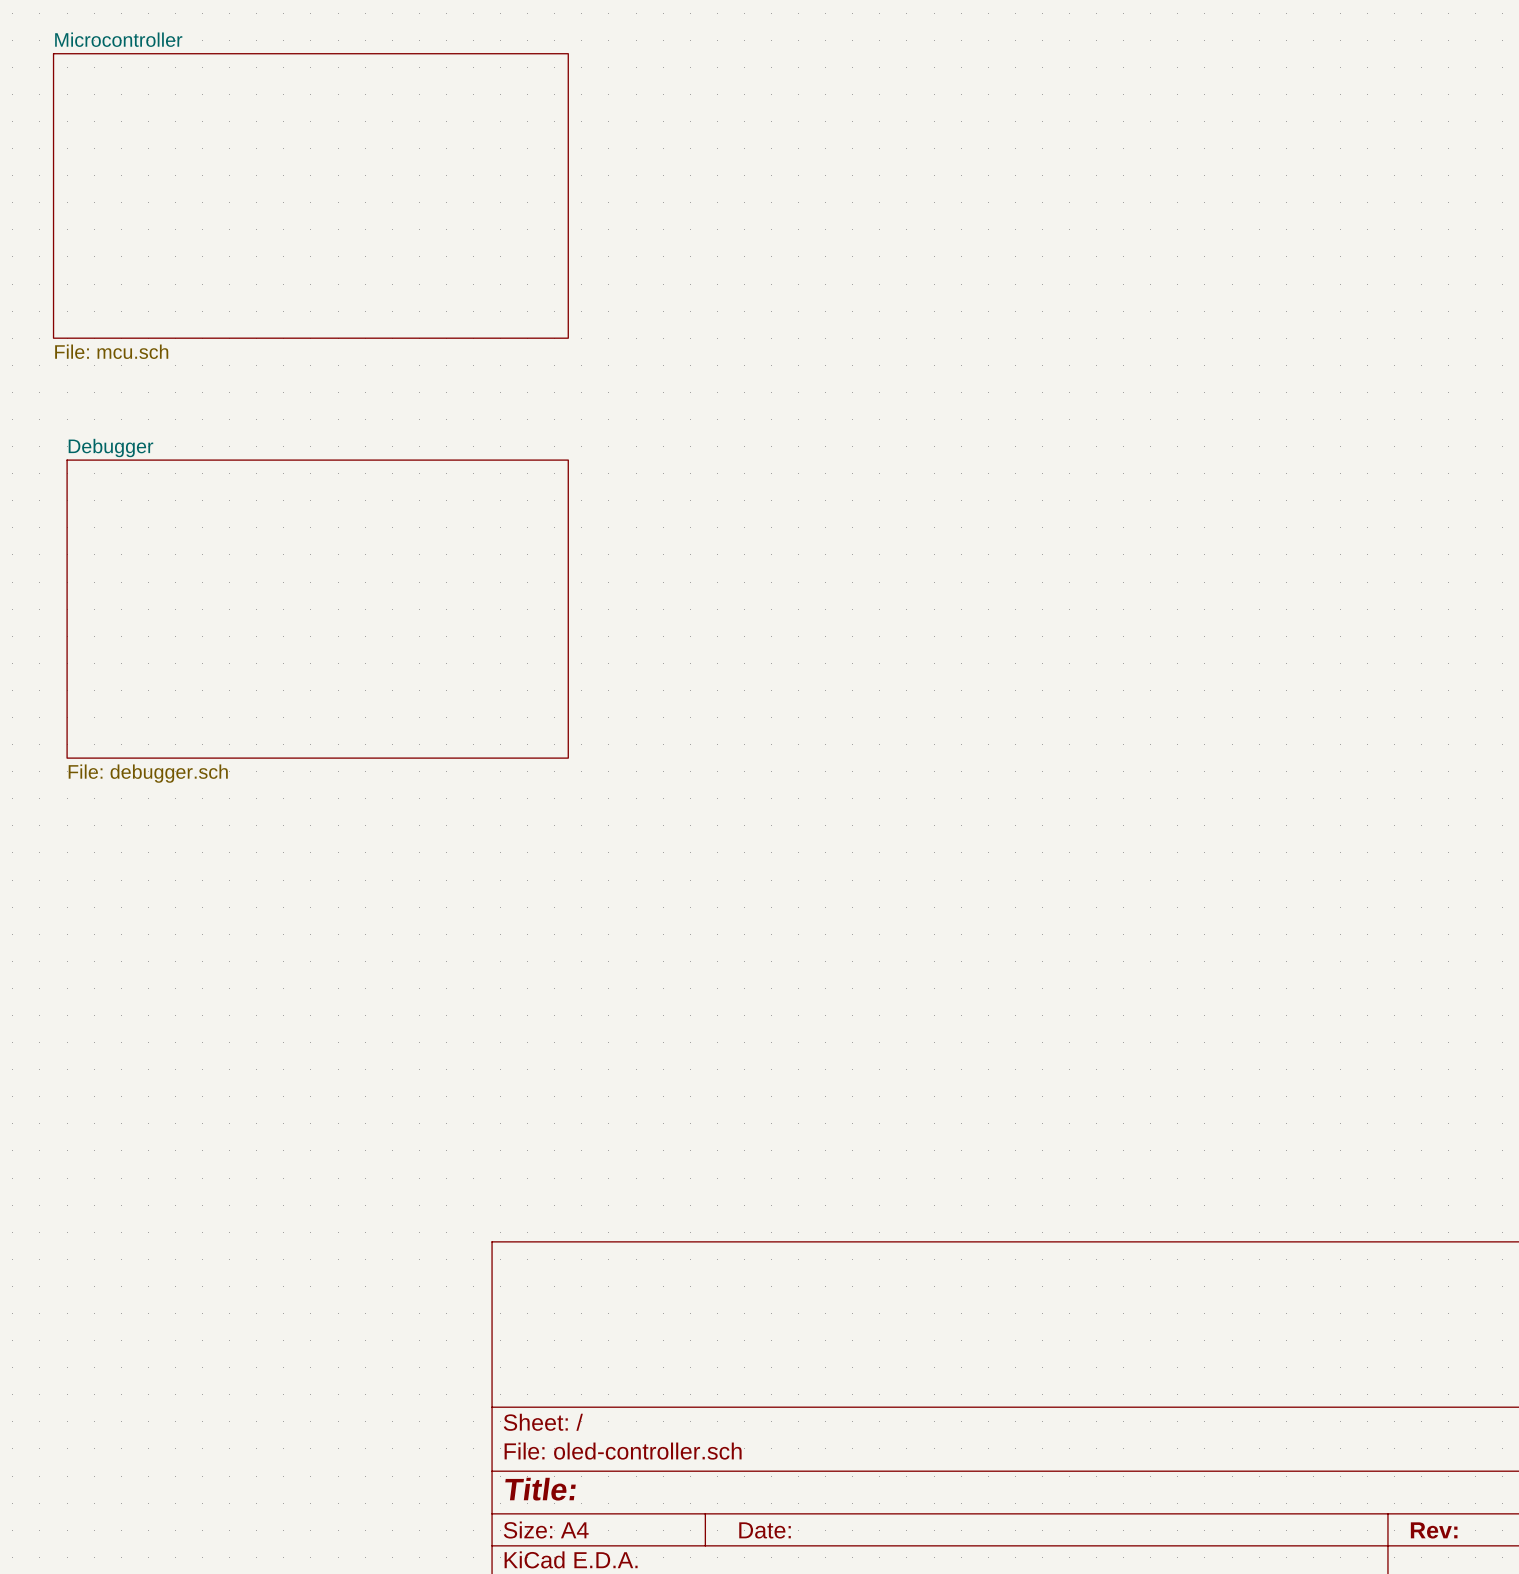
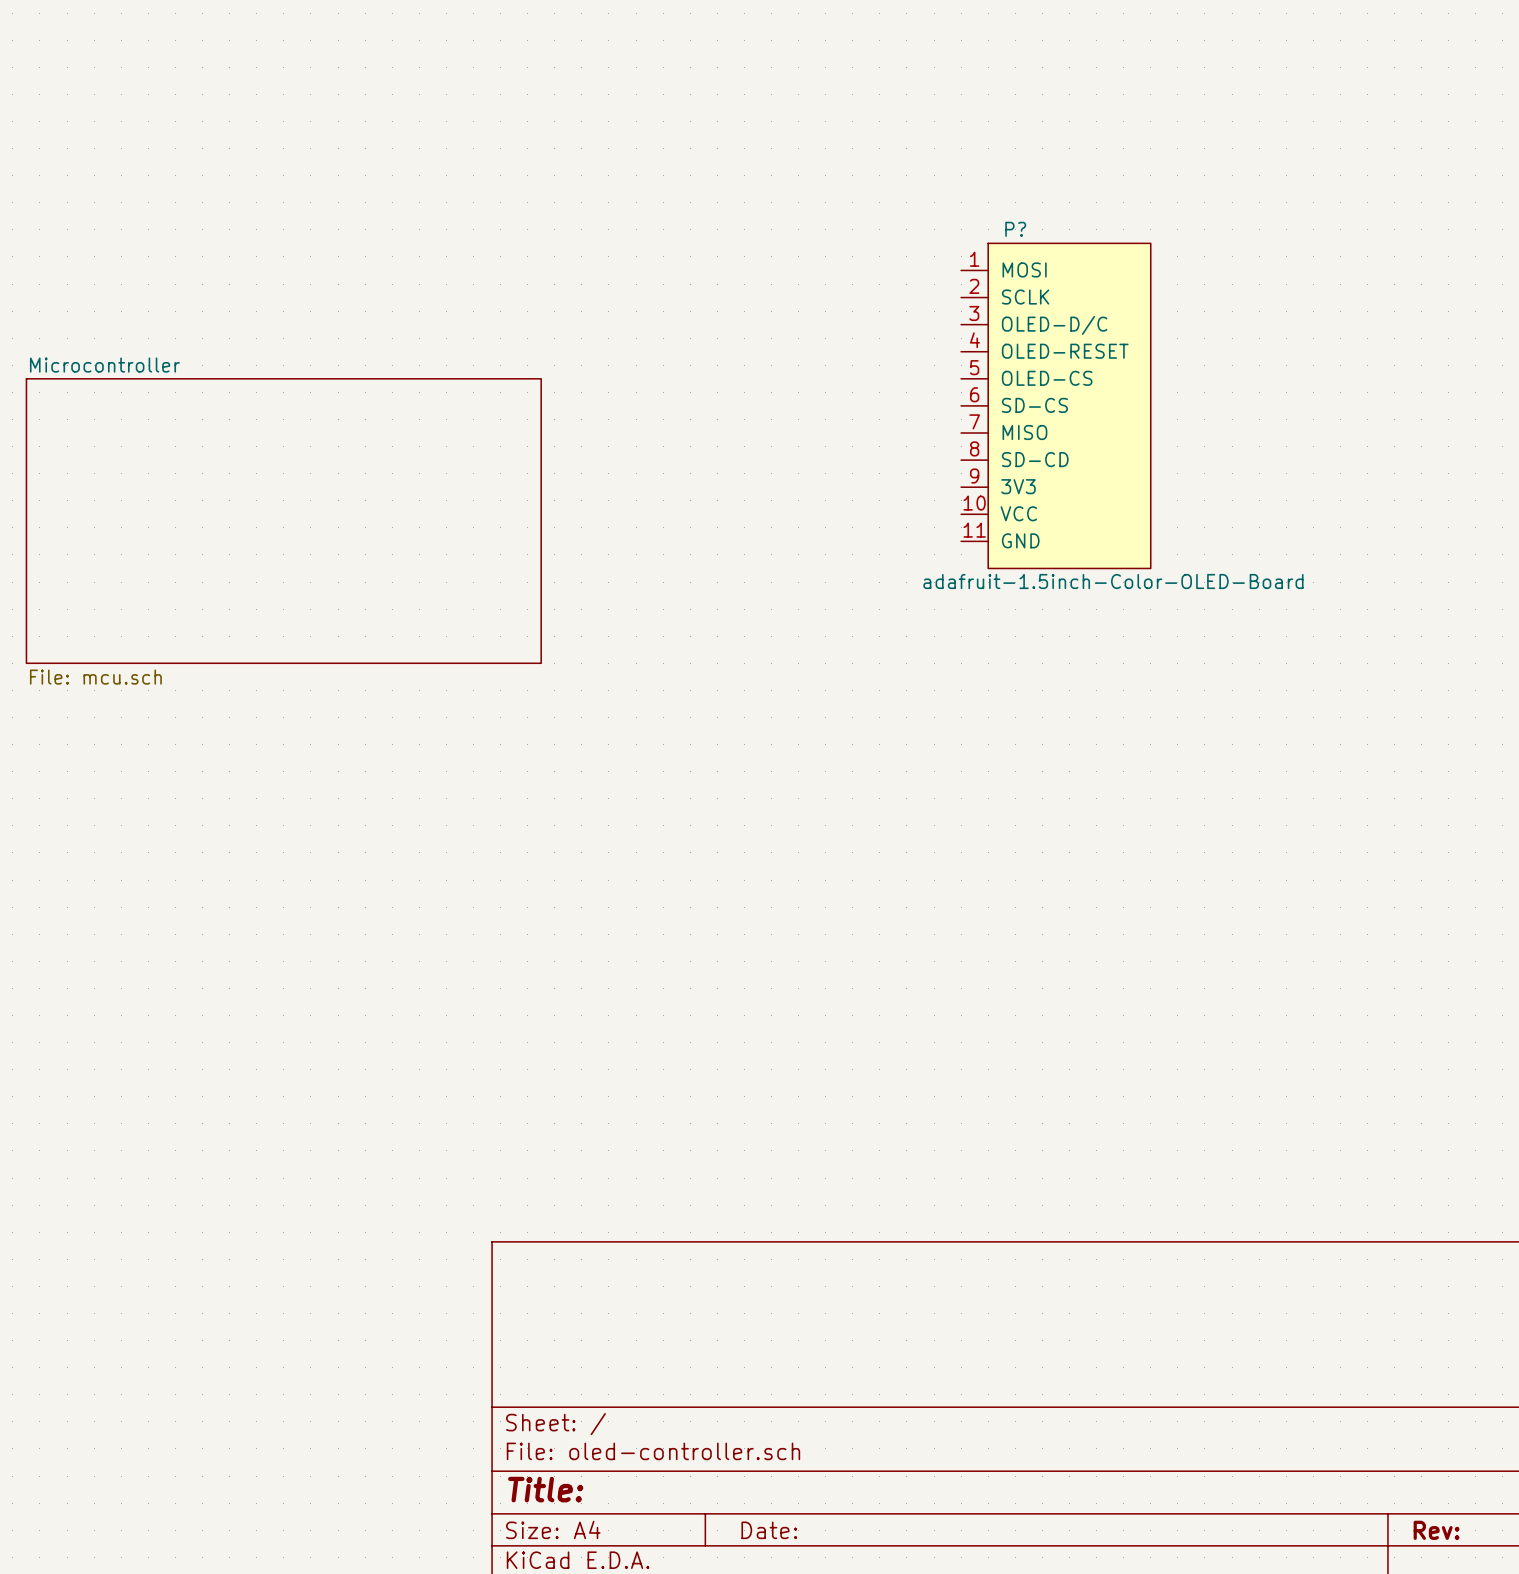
sheet Microcontroller: File: mcu.sch (310, 195) -> none
P?: none -> adafruit-1.5inch-Color-OLED-Board (1055, 405)
sheet Microcontroller: none -> File: mcu.sch (283, 521)
sheet Debugger: File: debugger.sch (317, 609) -> none

